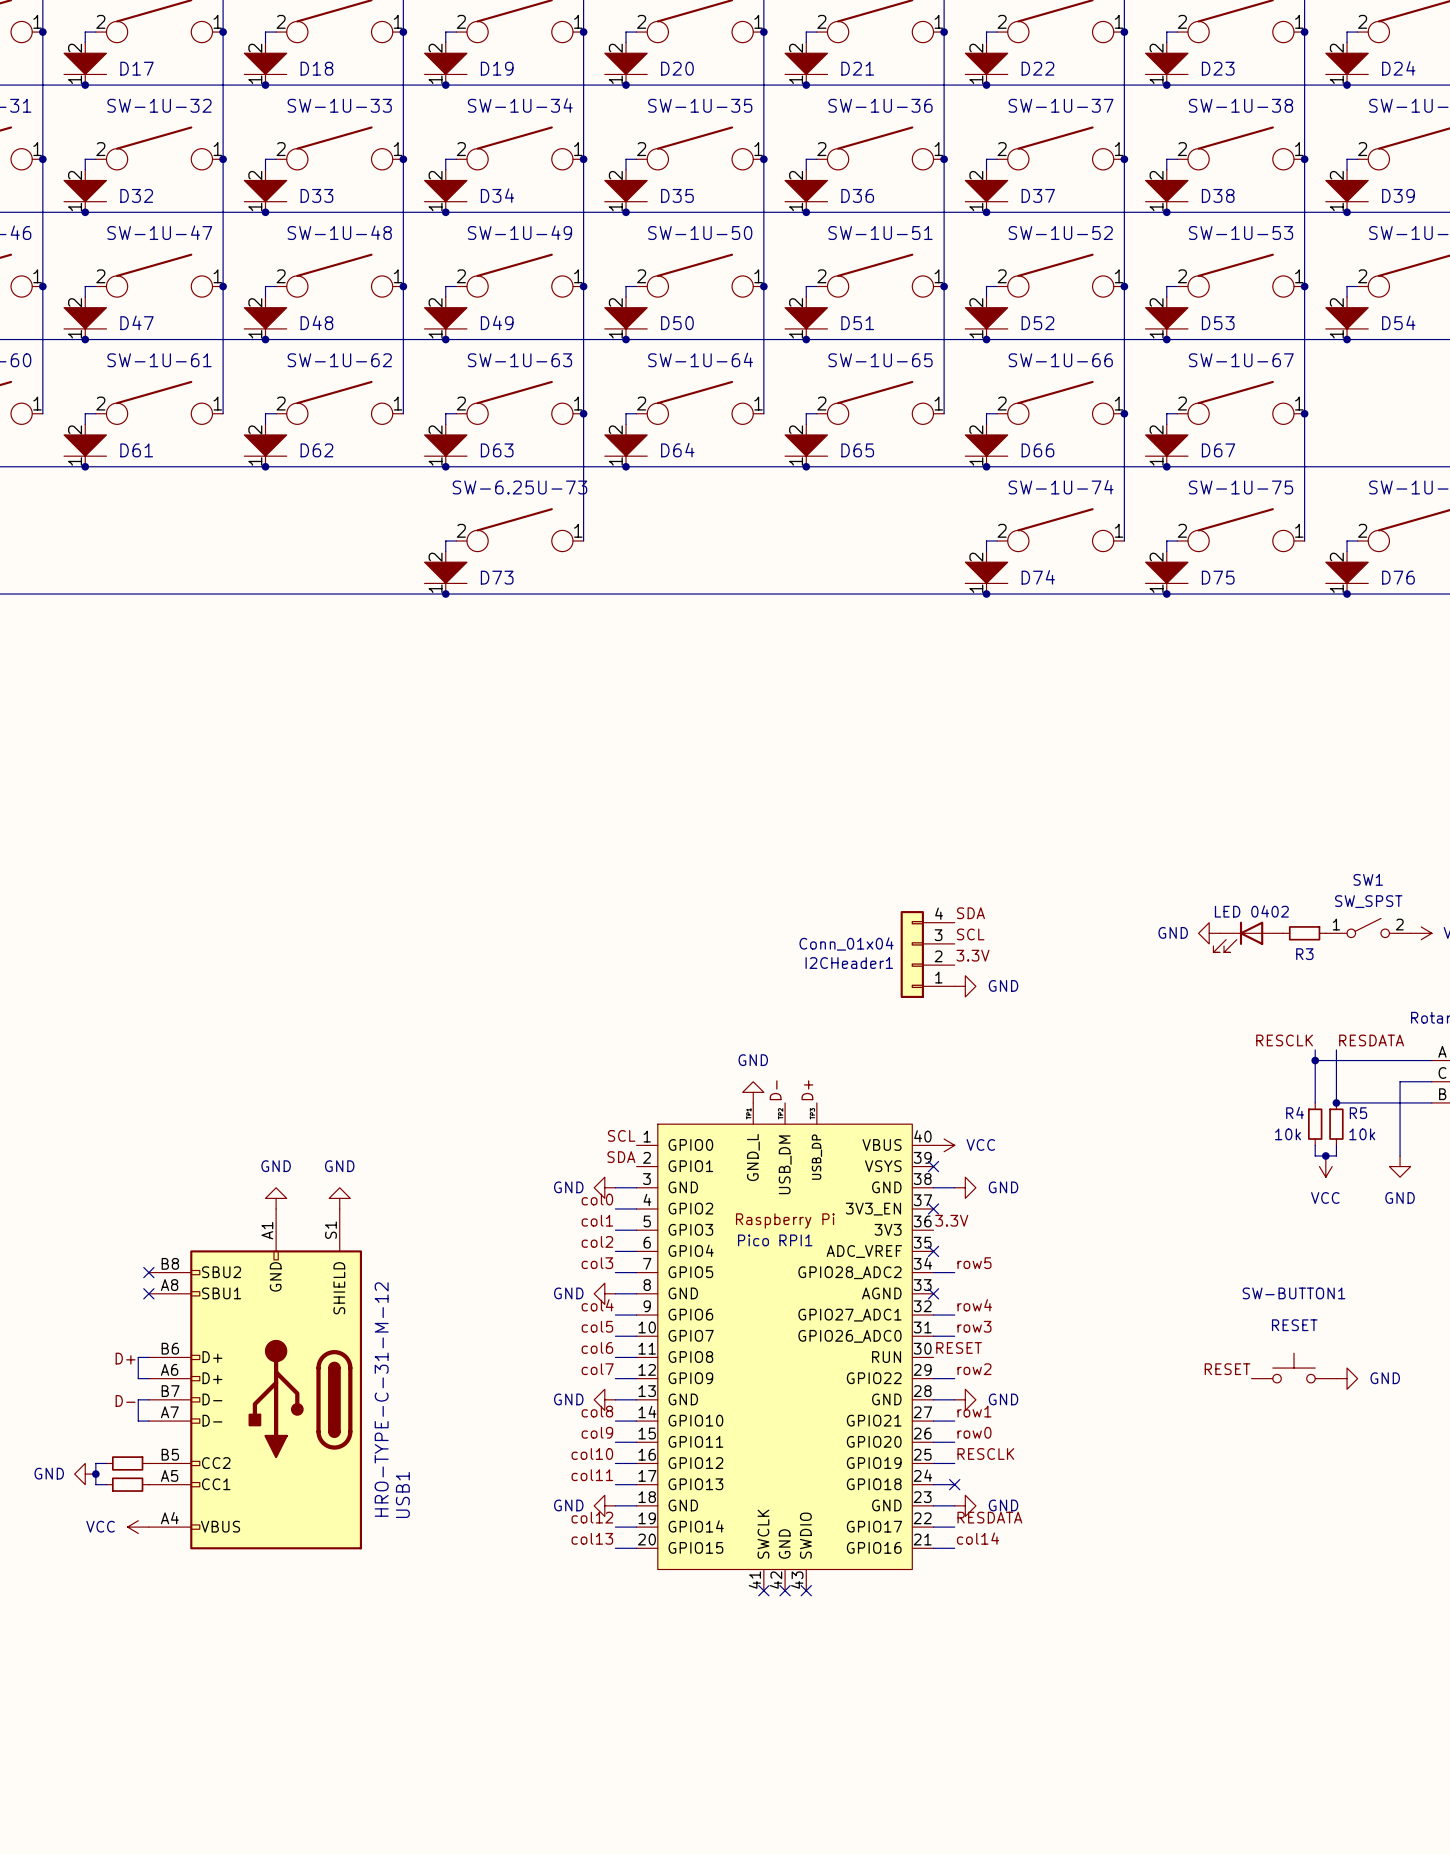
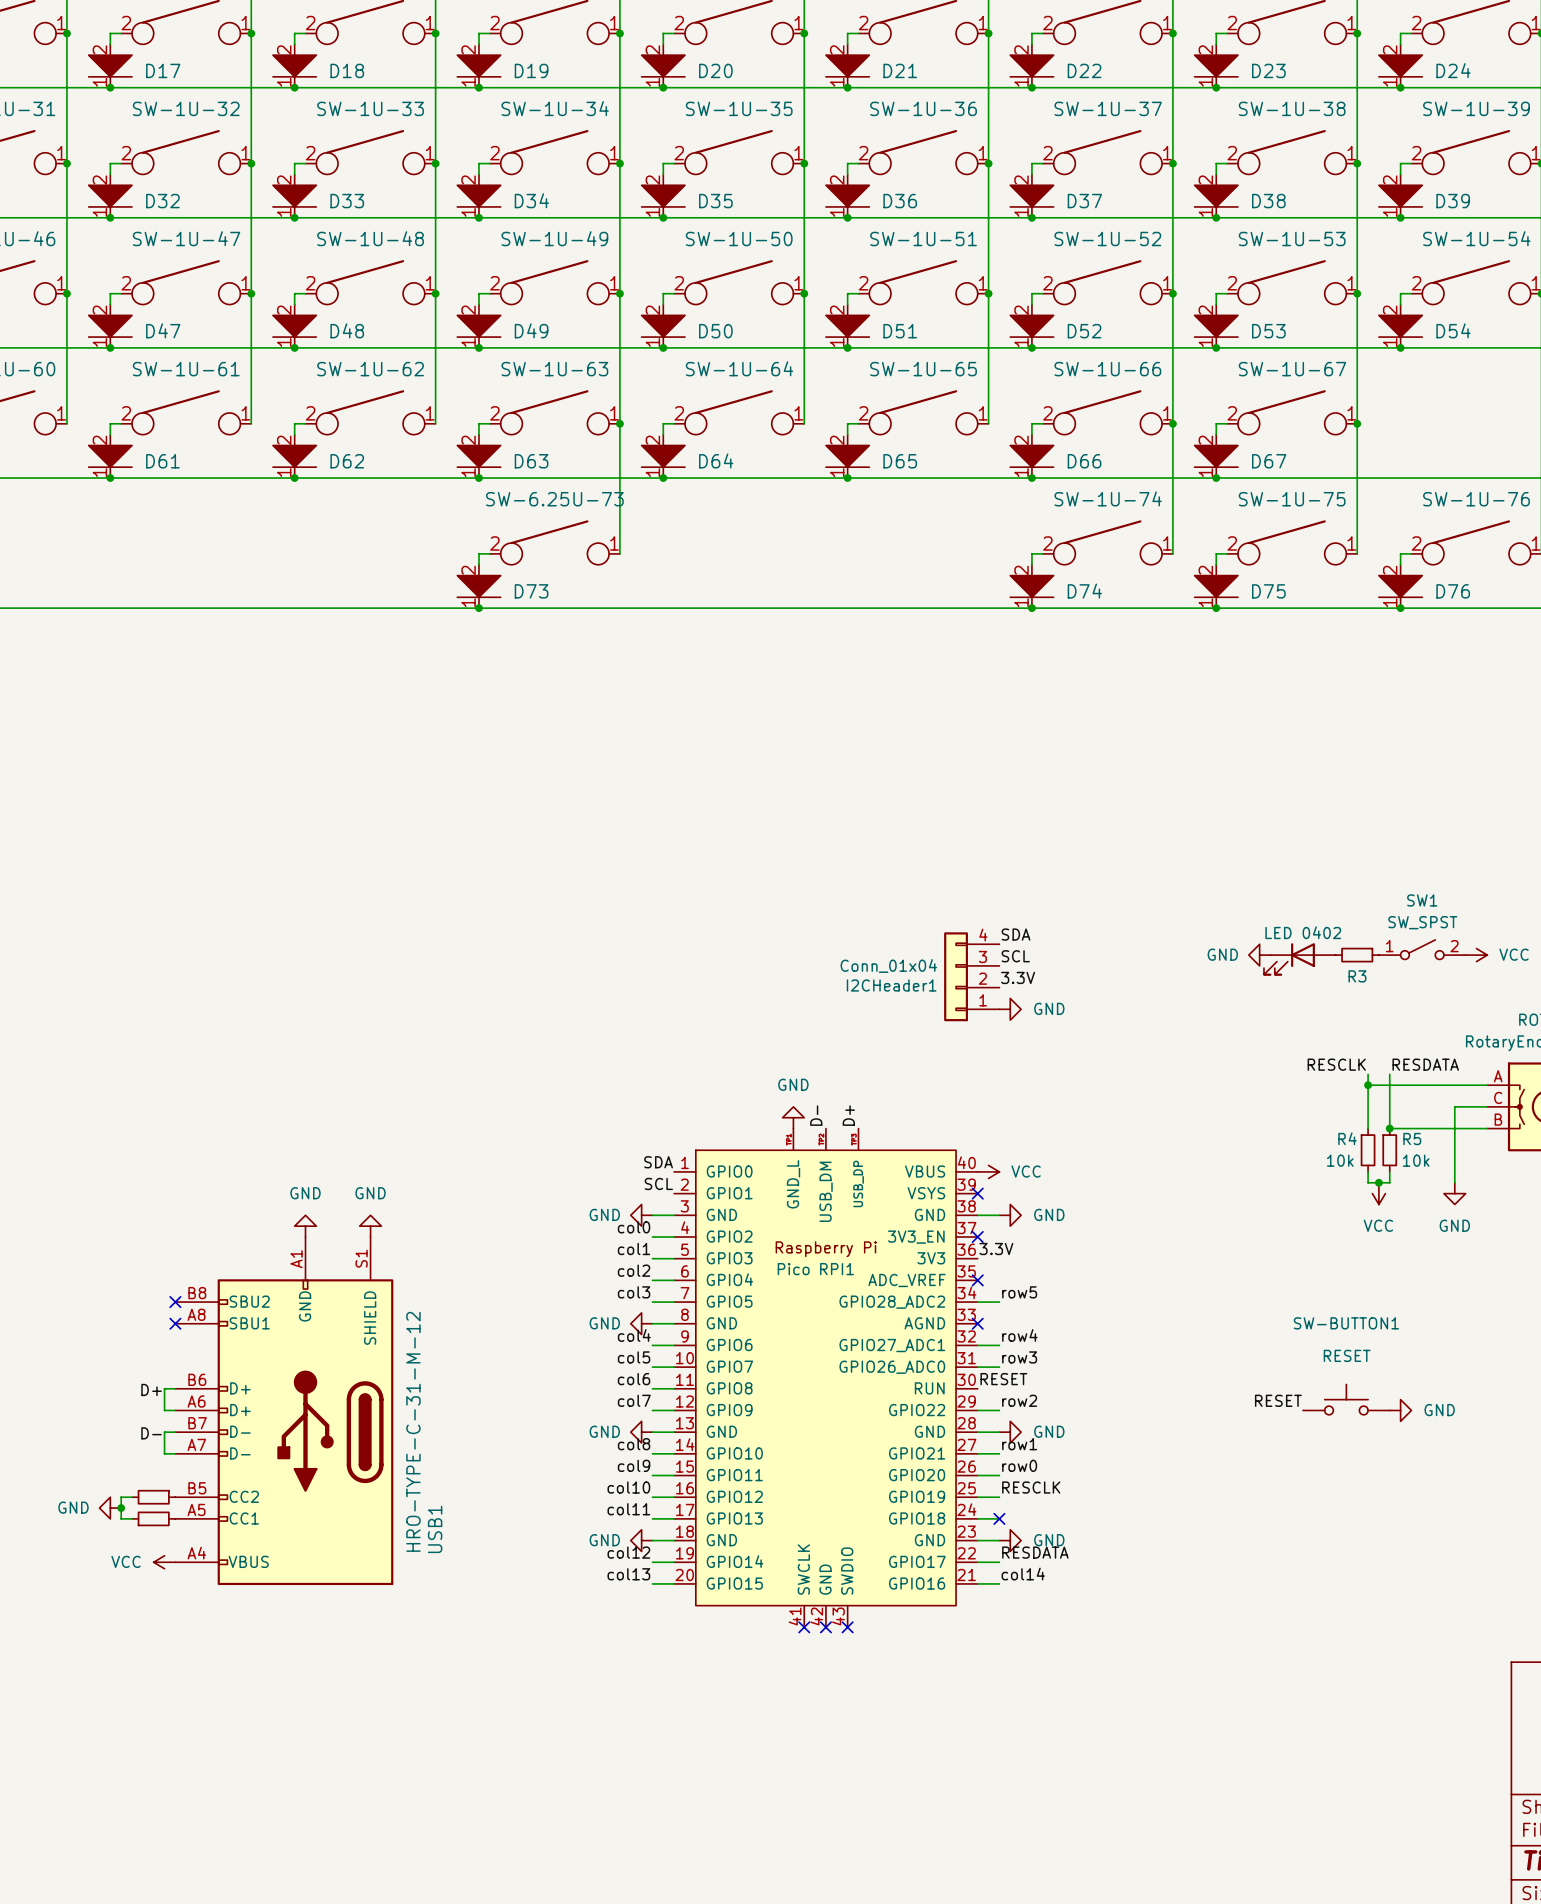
label: SCL (621, 1135) -> SDA (658, 1162)
label: SDA (621, 1157) -> SCL (658, 1183)

